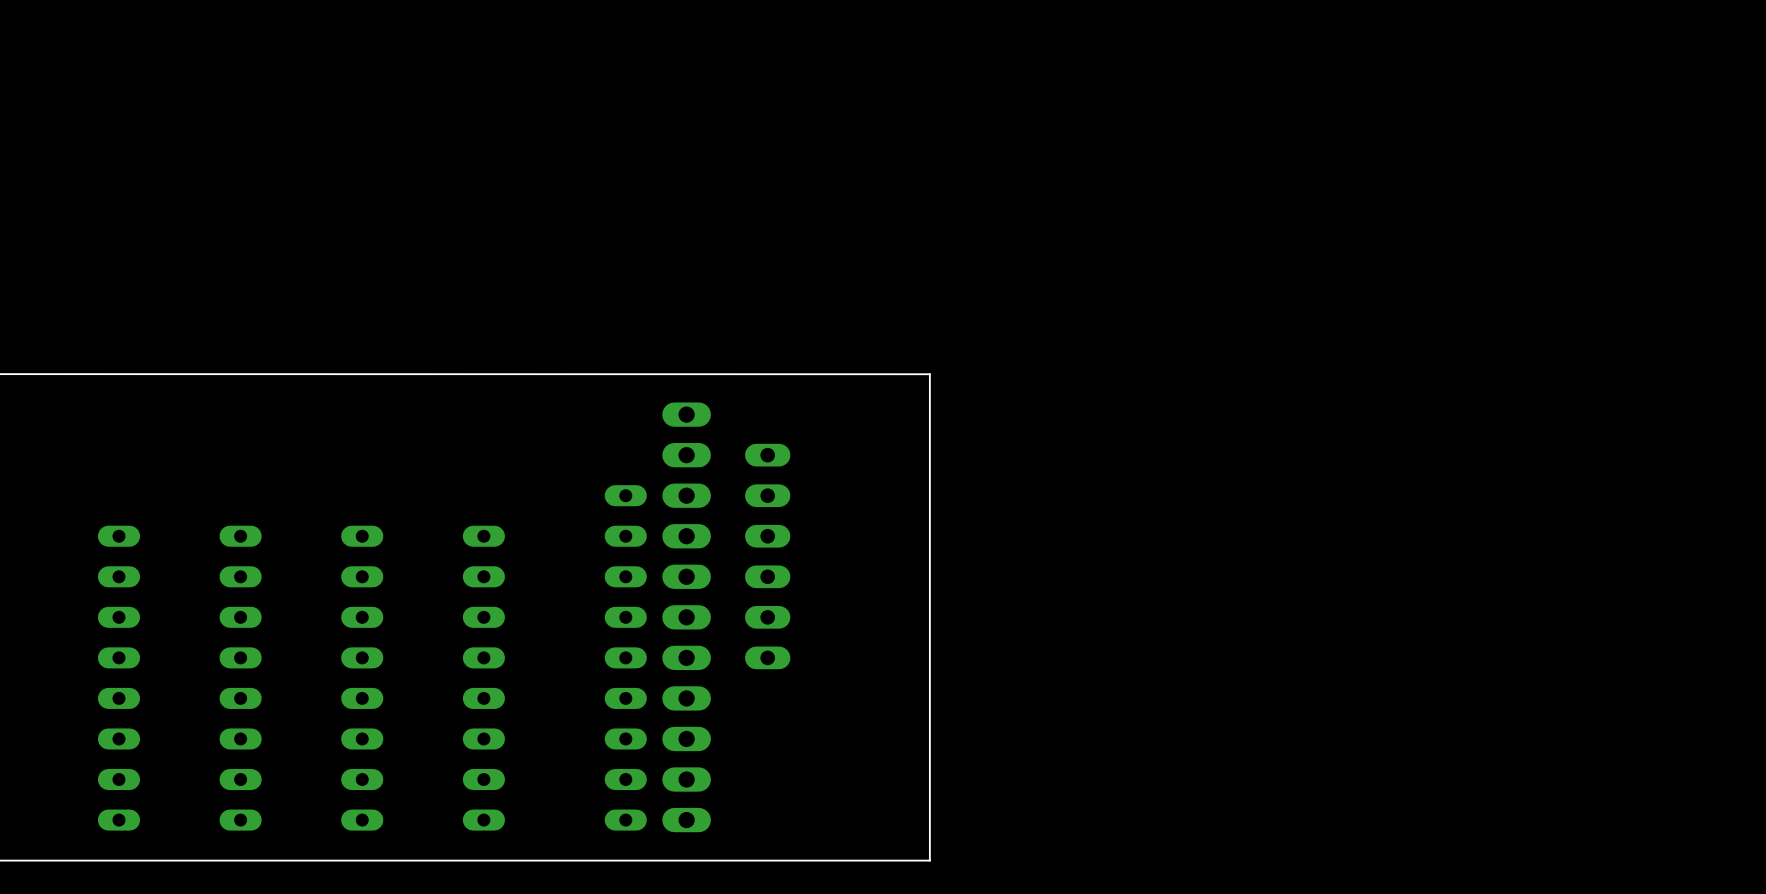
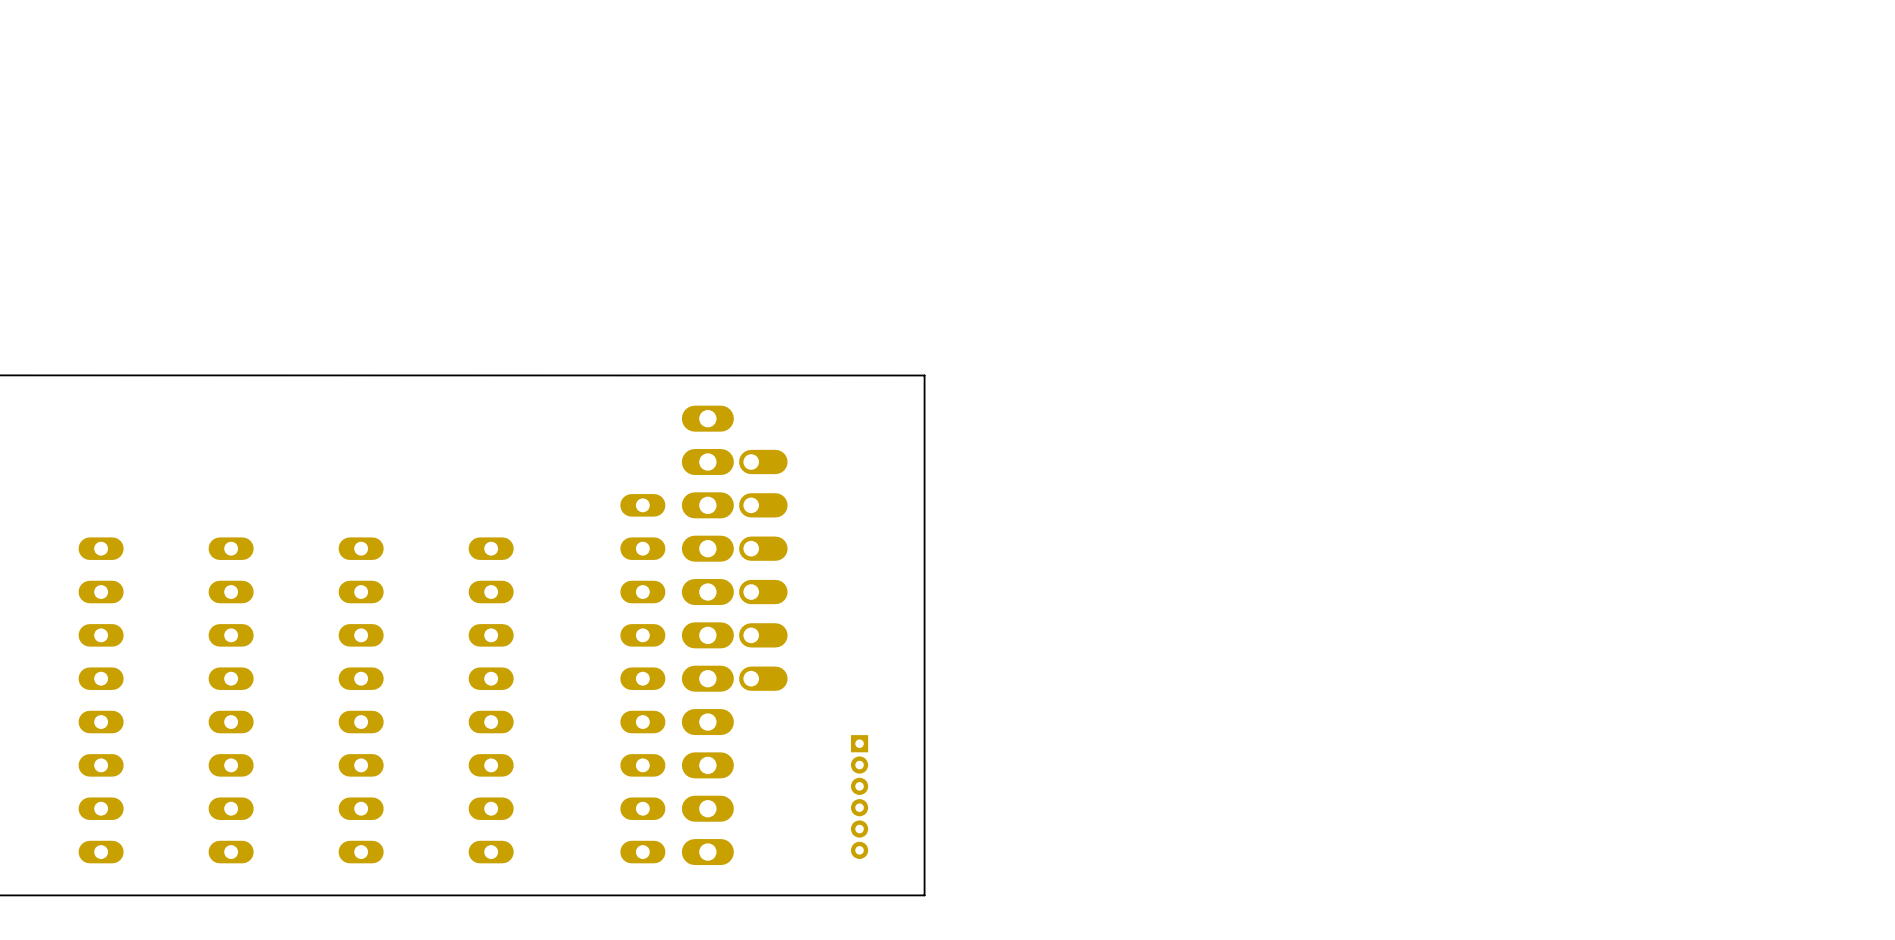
board edge: (889, 374) (929, 374) (929, 860) (889, 860) -> (924, 375) (924, 895)
part: none -> (763, 570)
part: (767, 556) -> none
part: none -> (859, 797)

